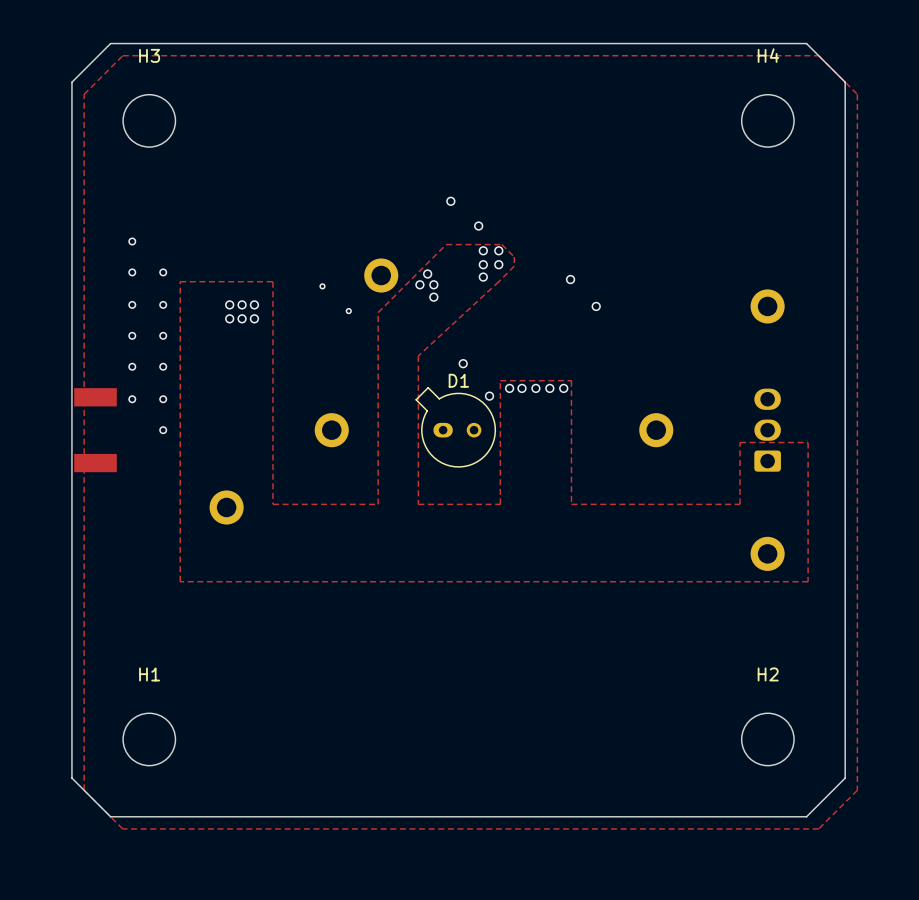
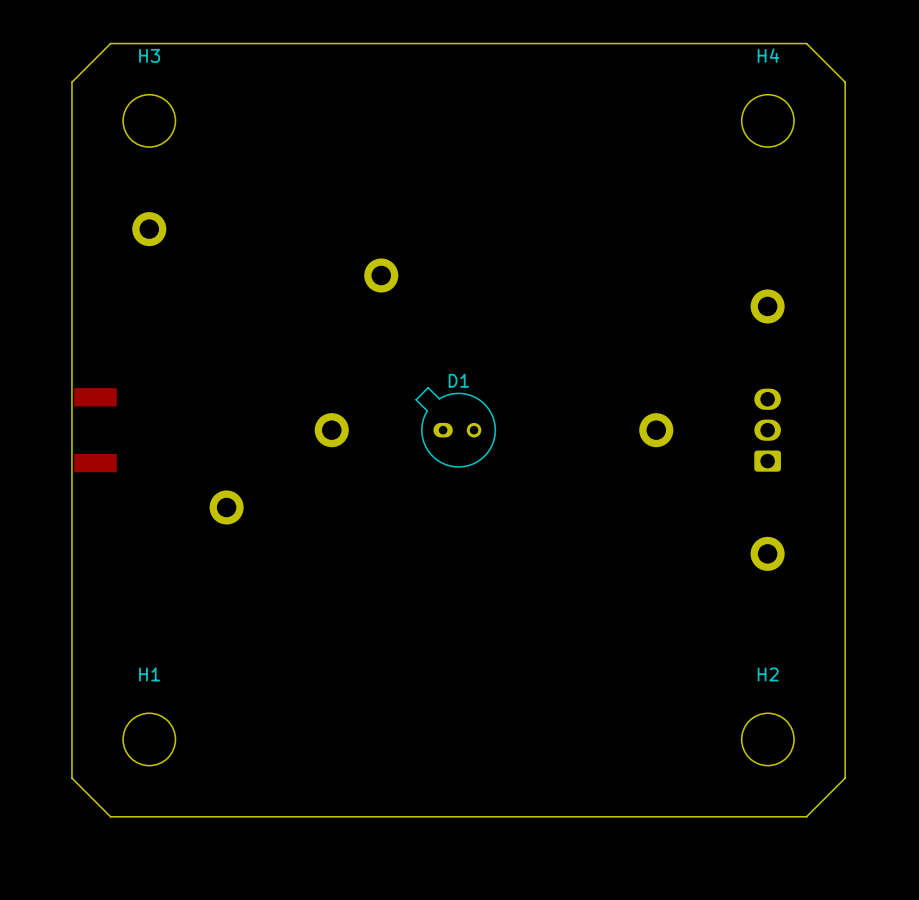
zone outline: (122, 55) (84, 94) (84, 790) (122, 828) (818, 828) (857, 790) (857, 94) (818, 55) (122, 55) -> none
via: (450, 201) -> none
via: (478, 226) -> none
part: none -> (149, 229)
via: (132, 241) -> none
zone outline: (446, 244) (378, 312) (378, 504) (273, 504) (273, 281) (180, 281) (180, 581) (808, 581) (808, 442) (740, 442) (740, 504) (571, 504) (571, 380) (500, 380) (500, 504) (418, 504) (418, 355) (514, 266) (514, 256) (501, 244) (446, 244) -> none
via: (483, 250) -> none
via: (498, 250) -> none
via: (483, 264) -> none
via: (498, 264) -> none
via: (132, 272) -> none
via: (163, 272) -> none
via: (427, 273) -> none
via: (483, 277) -> none
via: (570, 279) -> none
via: (419, 284) -> none
via: (433, 284) -> none
via: (322, 286) -> none
via: (433, 297) -> none
via: (132, 304) -> none
via: (163, 304) -> none
via: (229, 304) -> none
via: (242, 304) -> none
via: (254, 304) -> none
via: (596, 306) -> none
via: (348, 311) -> none
via: (229, 318) -> none
via: (242, 318) -> none
via: (254, 318) -> none
via: (132, 335) -> none
via: (163, 335) -> none
via: (463, 363) -> none
via: (132, 366) -> none
via: (163, 366) -> none
via: (509, 388) -> none
via: (521, 388) -> none
via: (535, 388) -> none
via: (549, 388) -> none
via: (563, 388) -> none
via: (489, 396) -> none
via: (132, 399) -> none
via: (163, 399) -> none
via: (163, 430) -> none

